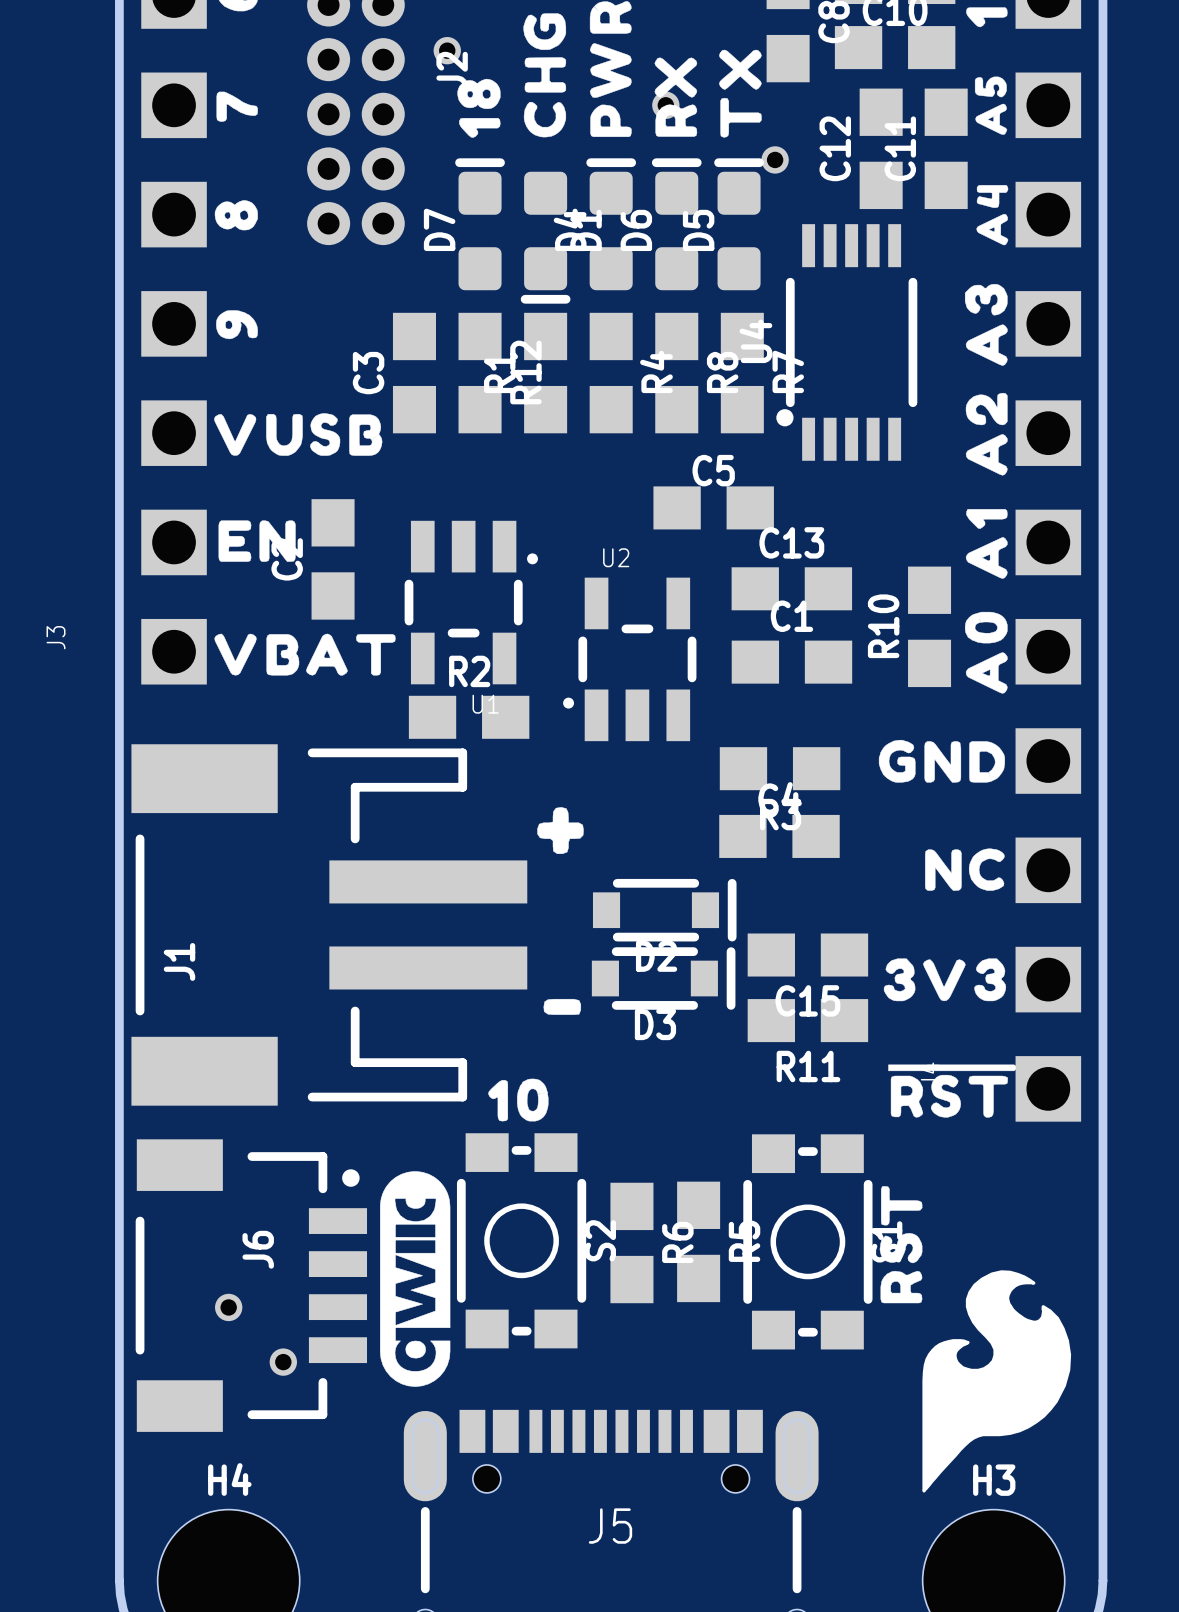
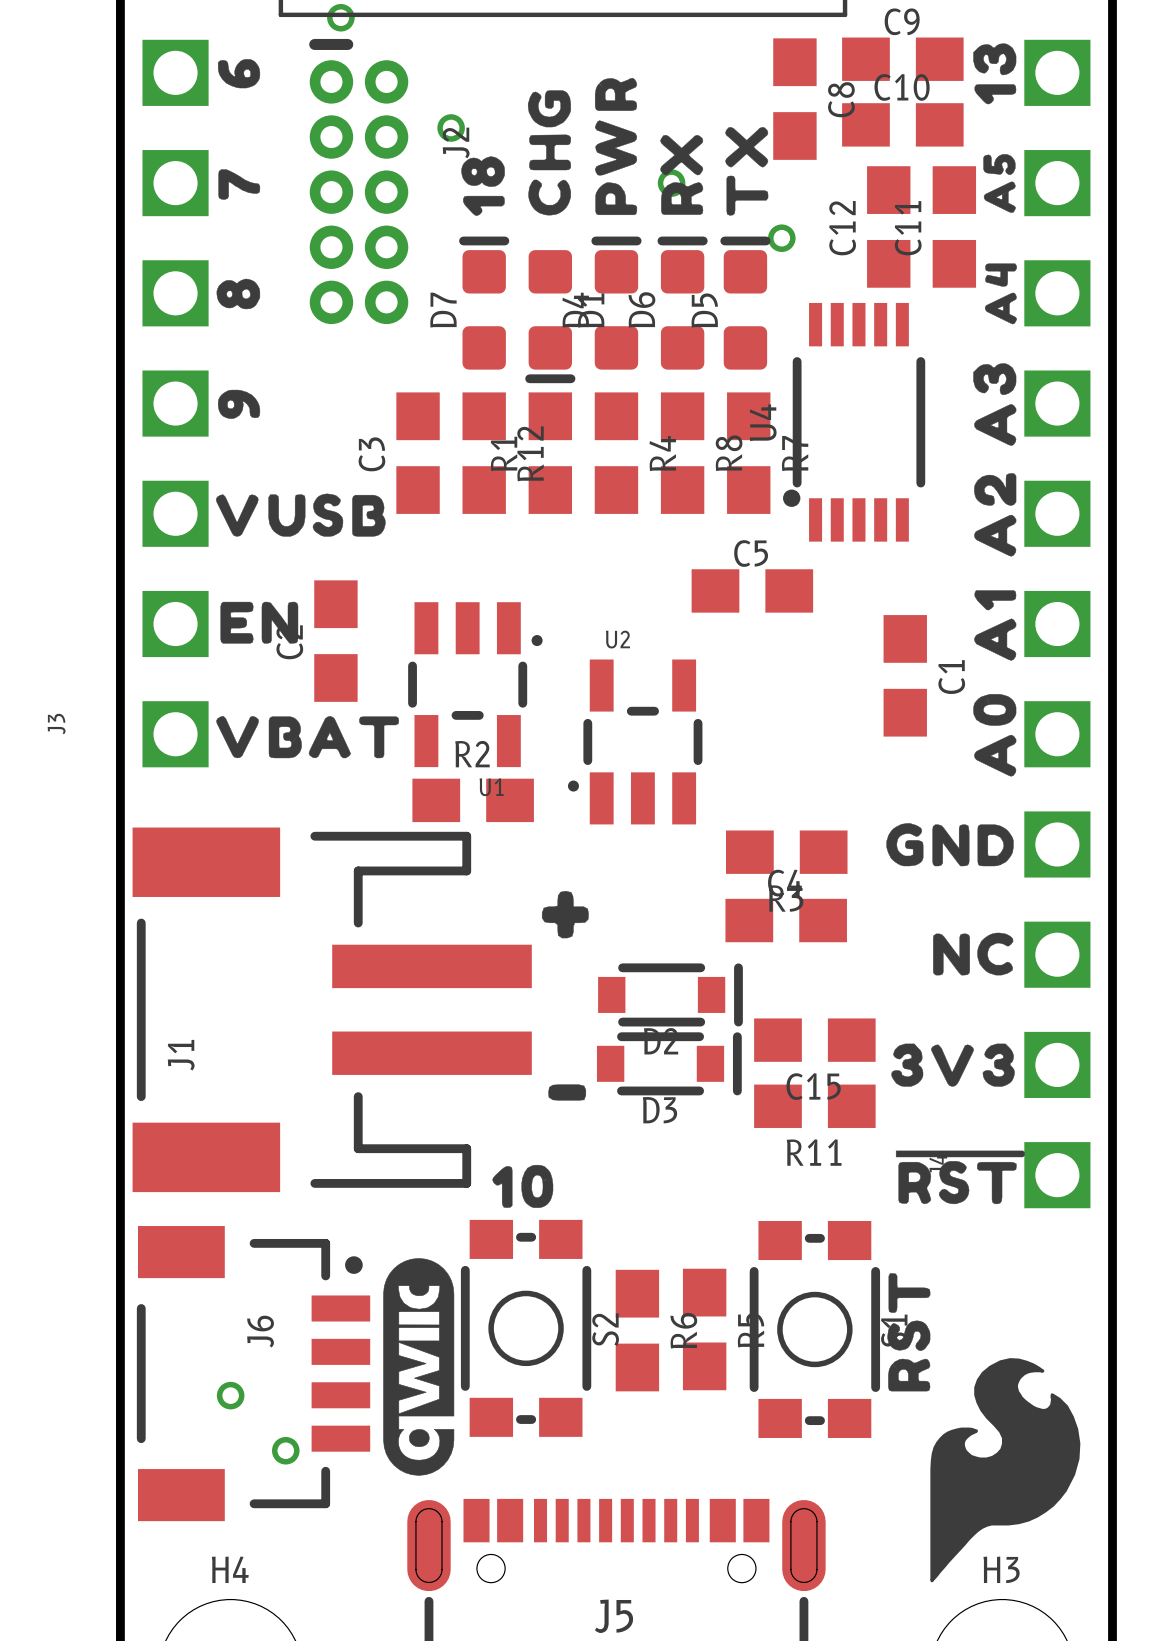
C5 position: (713, 507) -> (752, 590)
C13: (791, 588) -> none
R10: (929, 626) -> none
C1 rotation: 0° (791, 662) -> 90° clockwise (905, 675)
C1 position: (791, 662) -> (905, 675)

